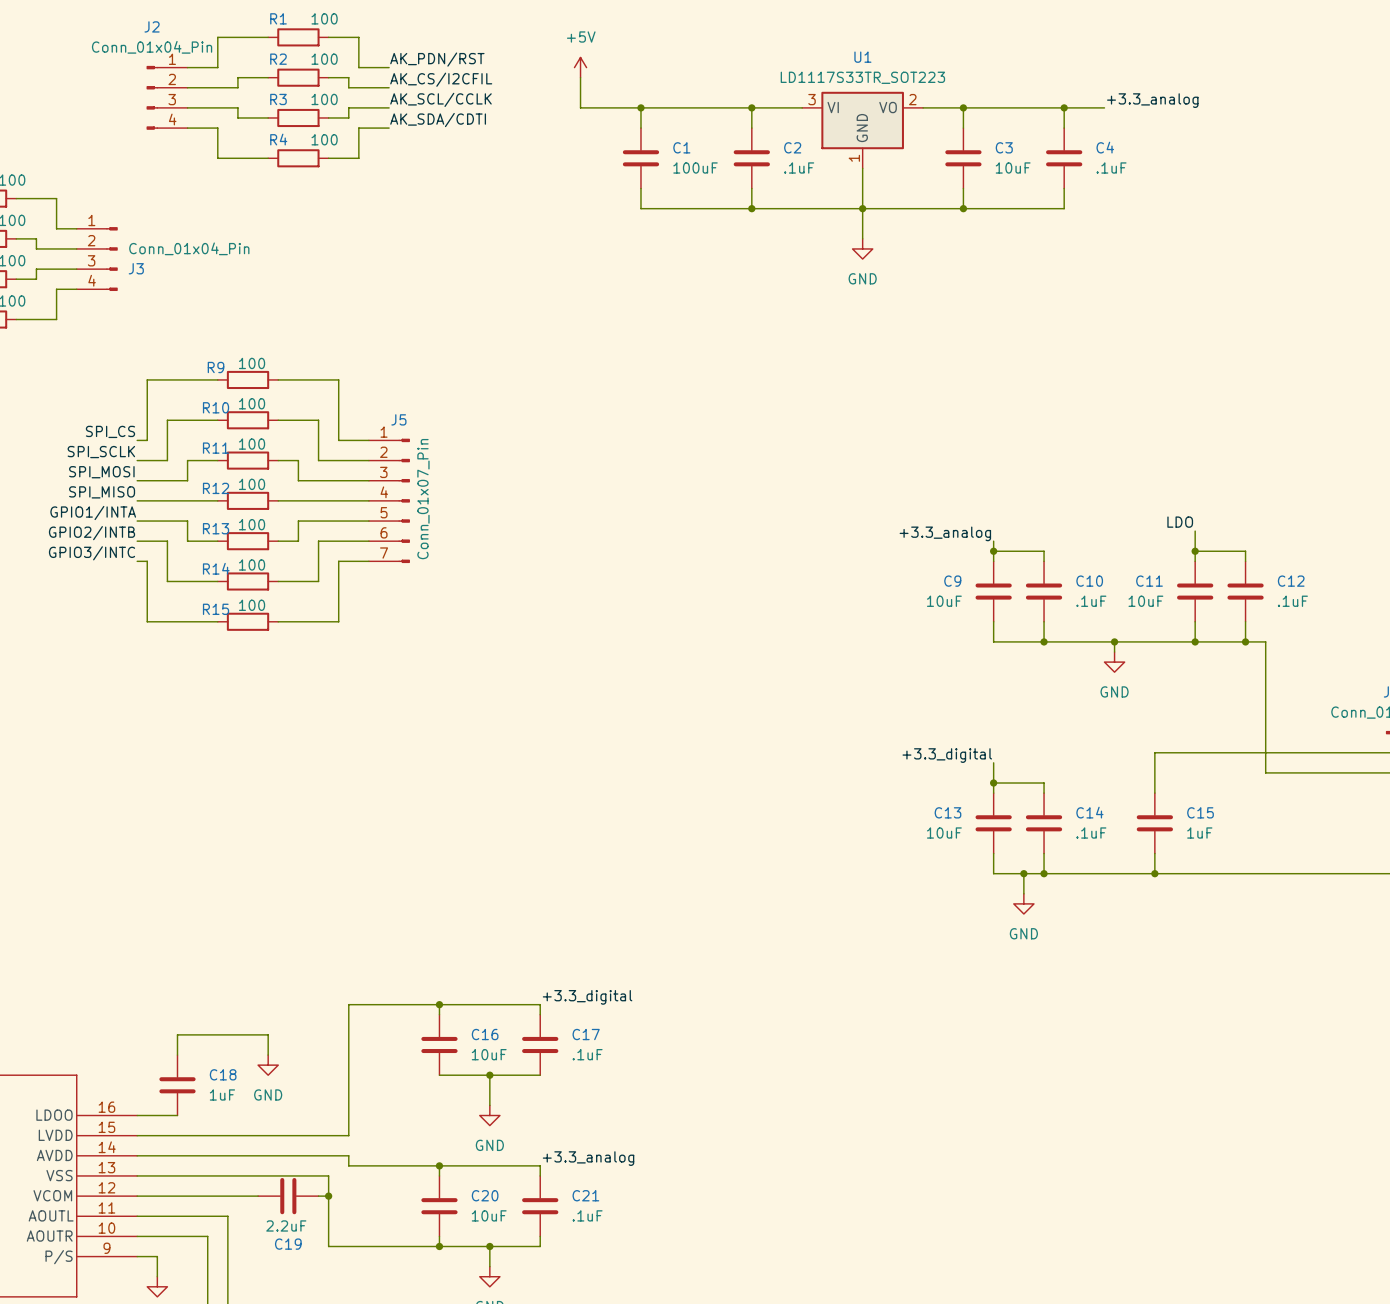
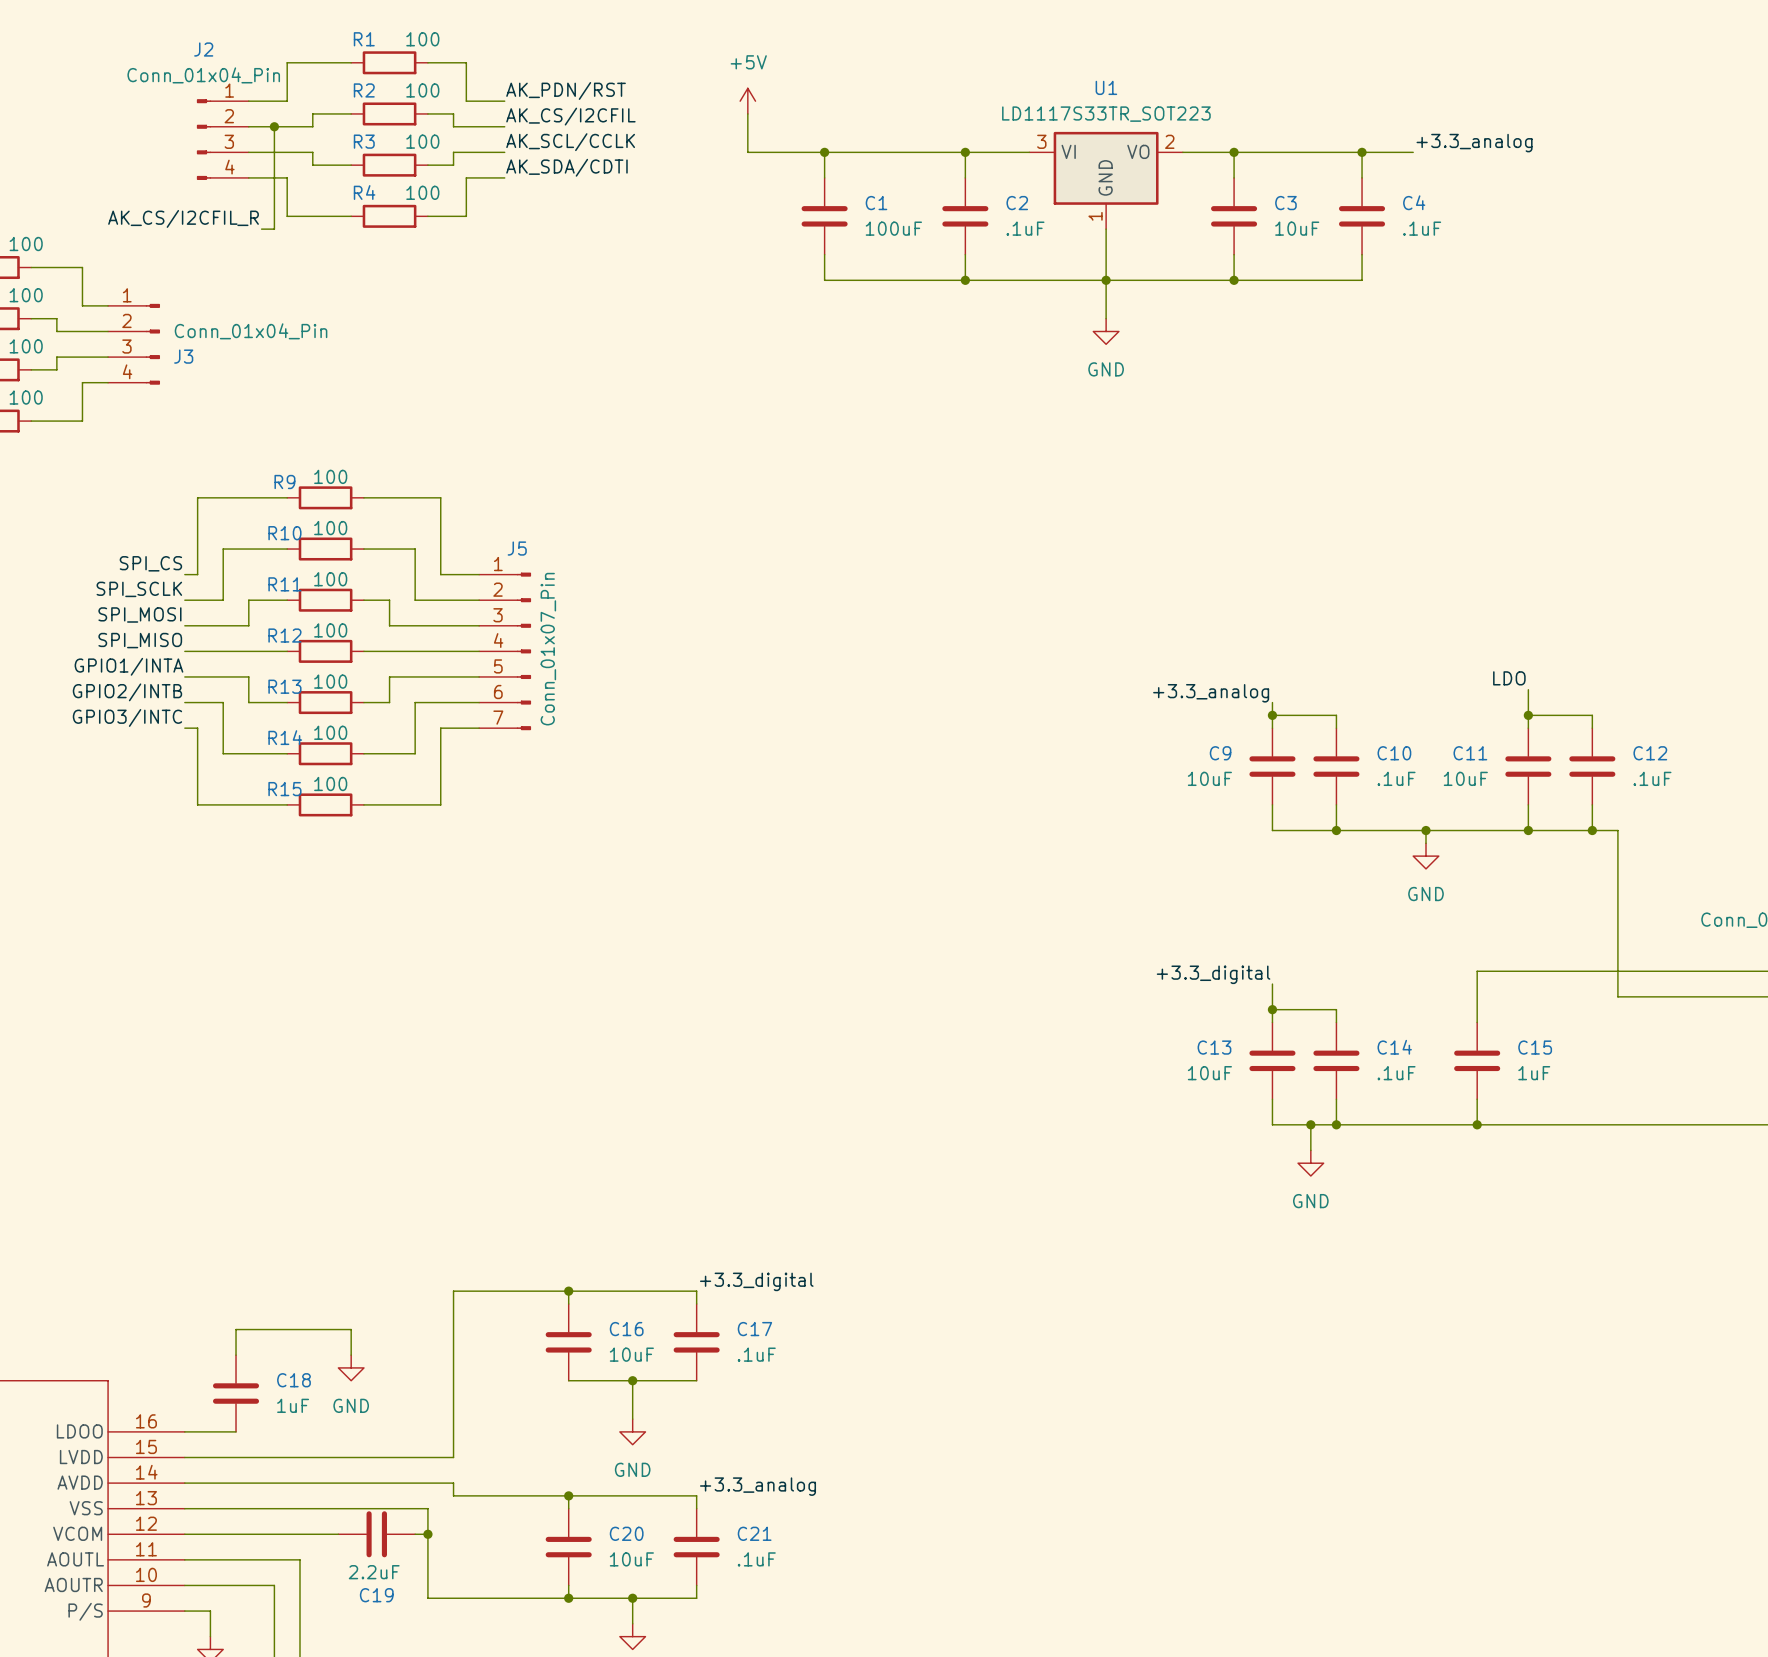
wire: none -> (274, 126) (274, 229) (261, 229)
junction: none -> (274, 126)
label: none -> AK_CS/I2CFIL_R (183, 218)

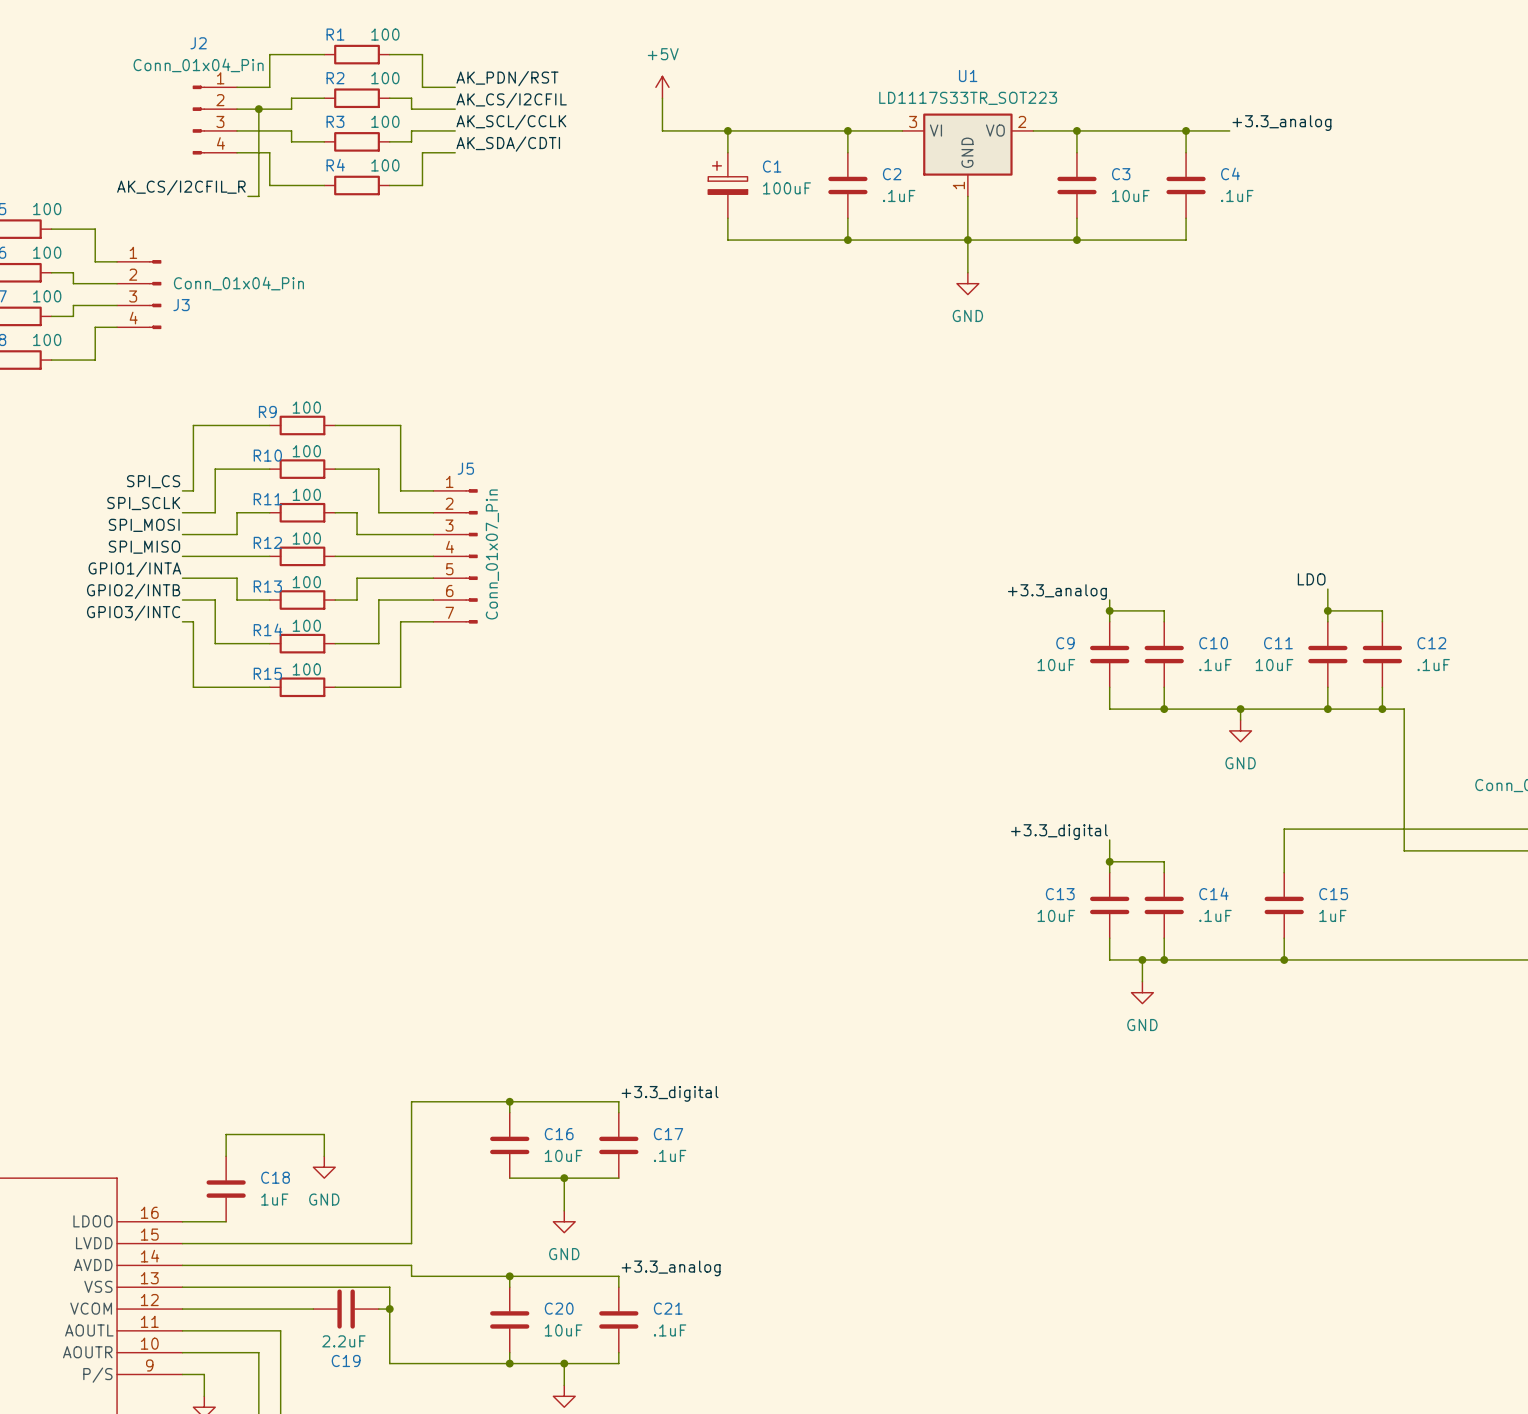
C1 symbol: [801, 177, 848, 255] -> [708, 152, 748, 219]

